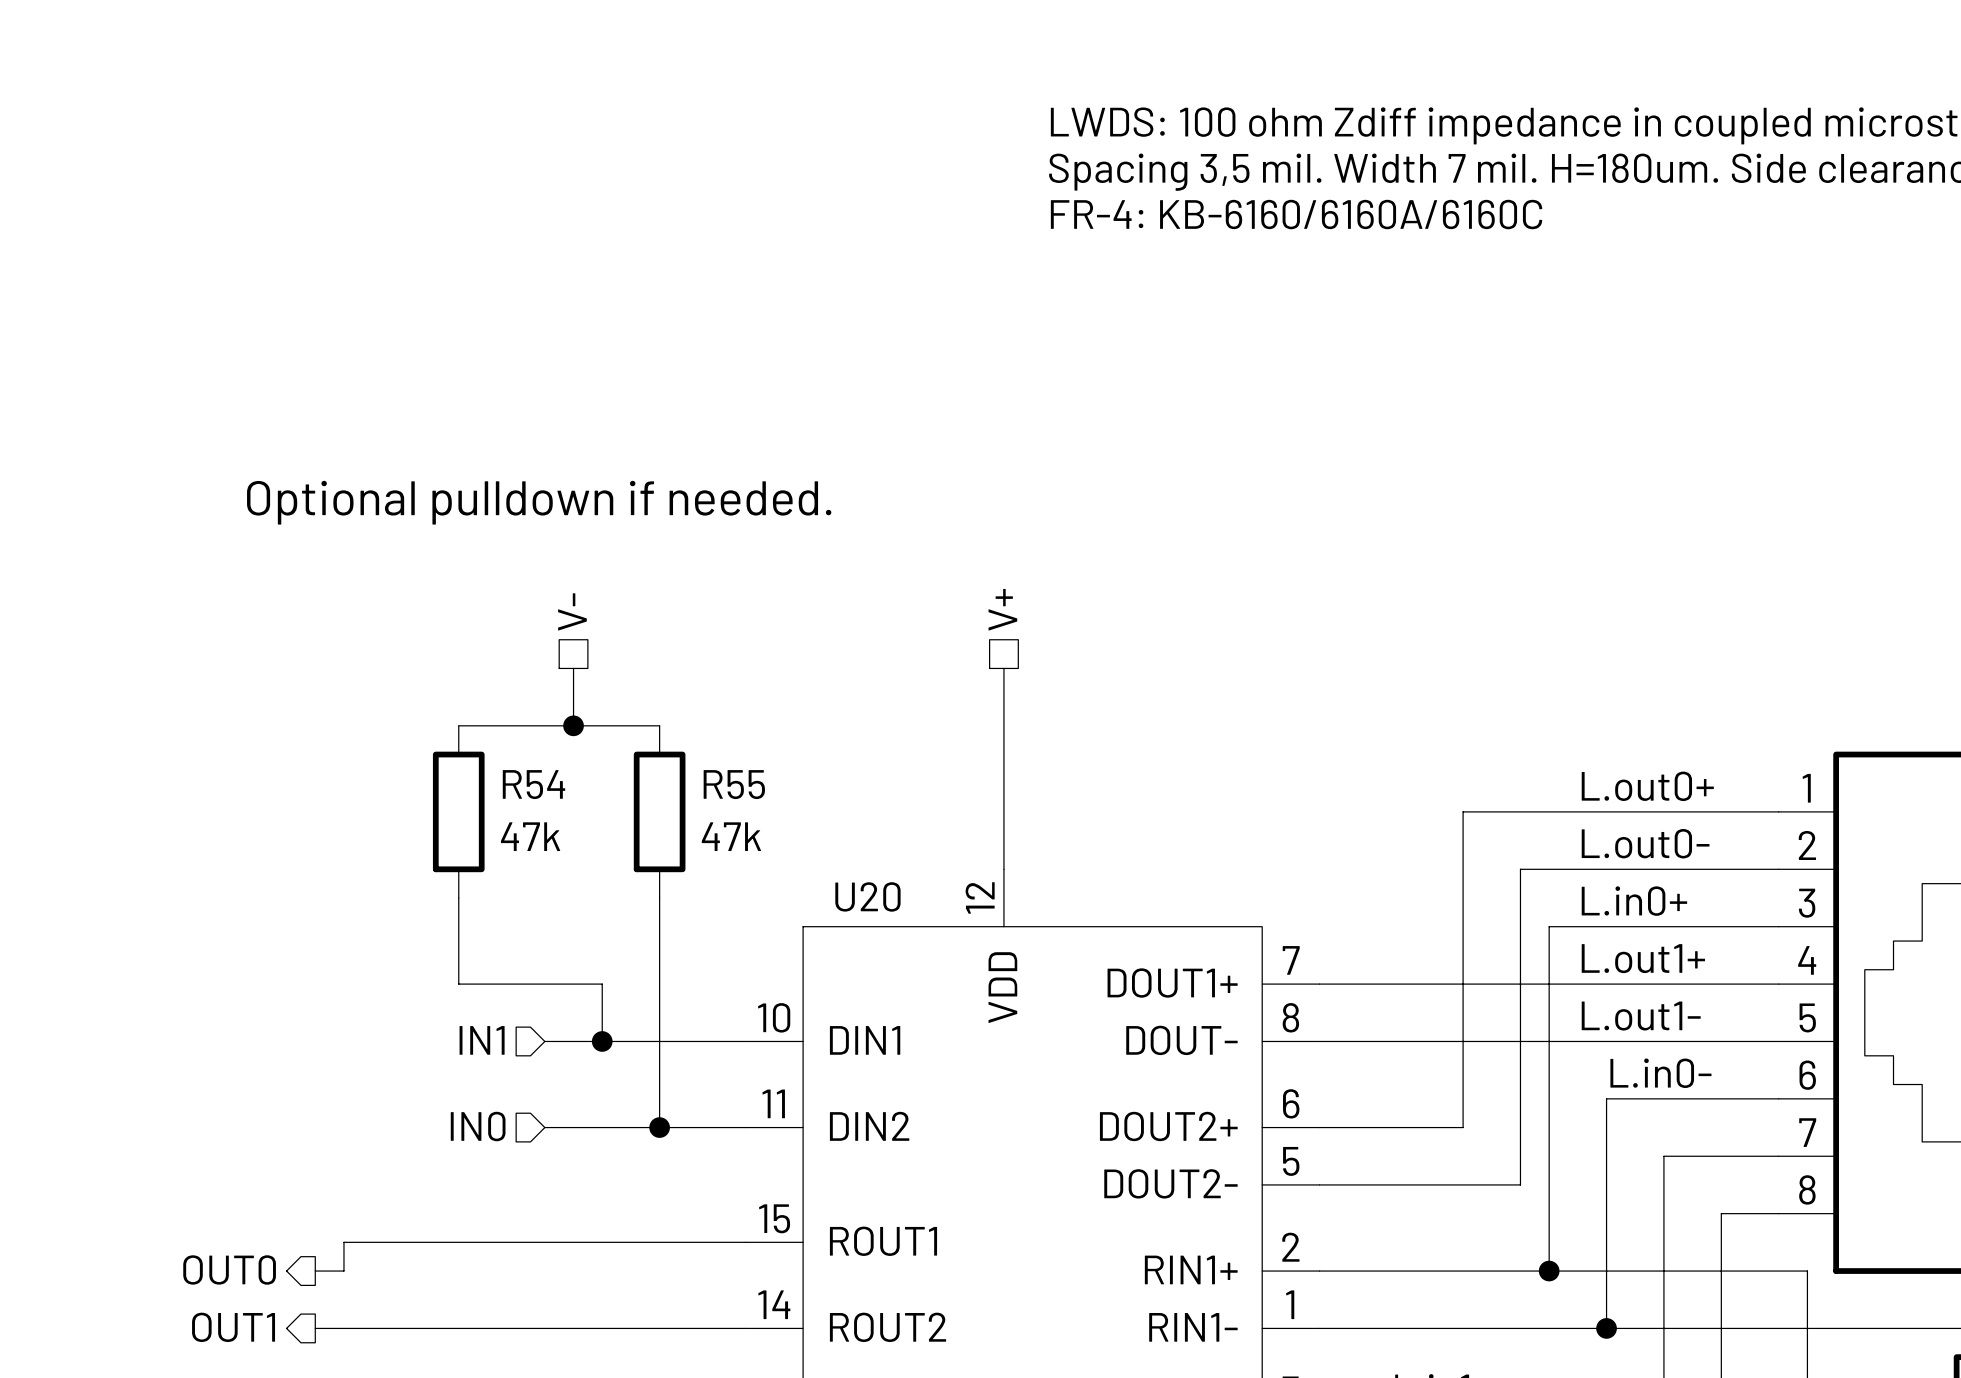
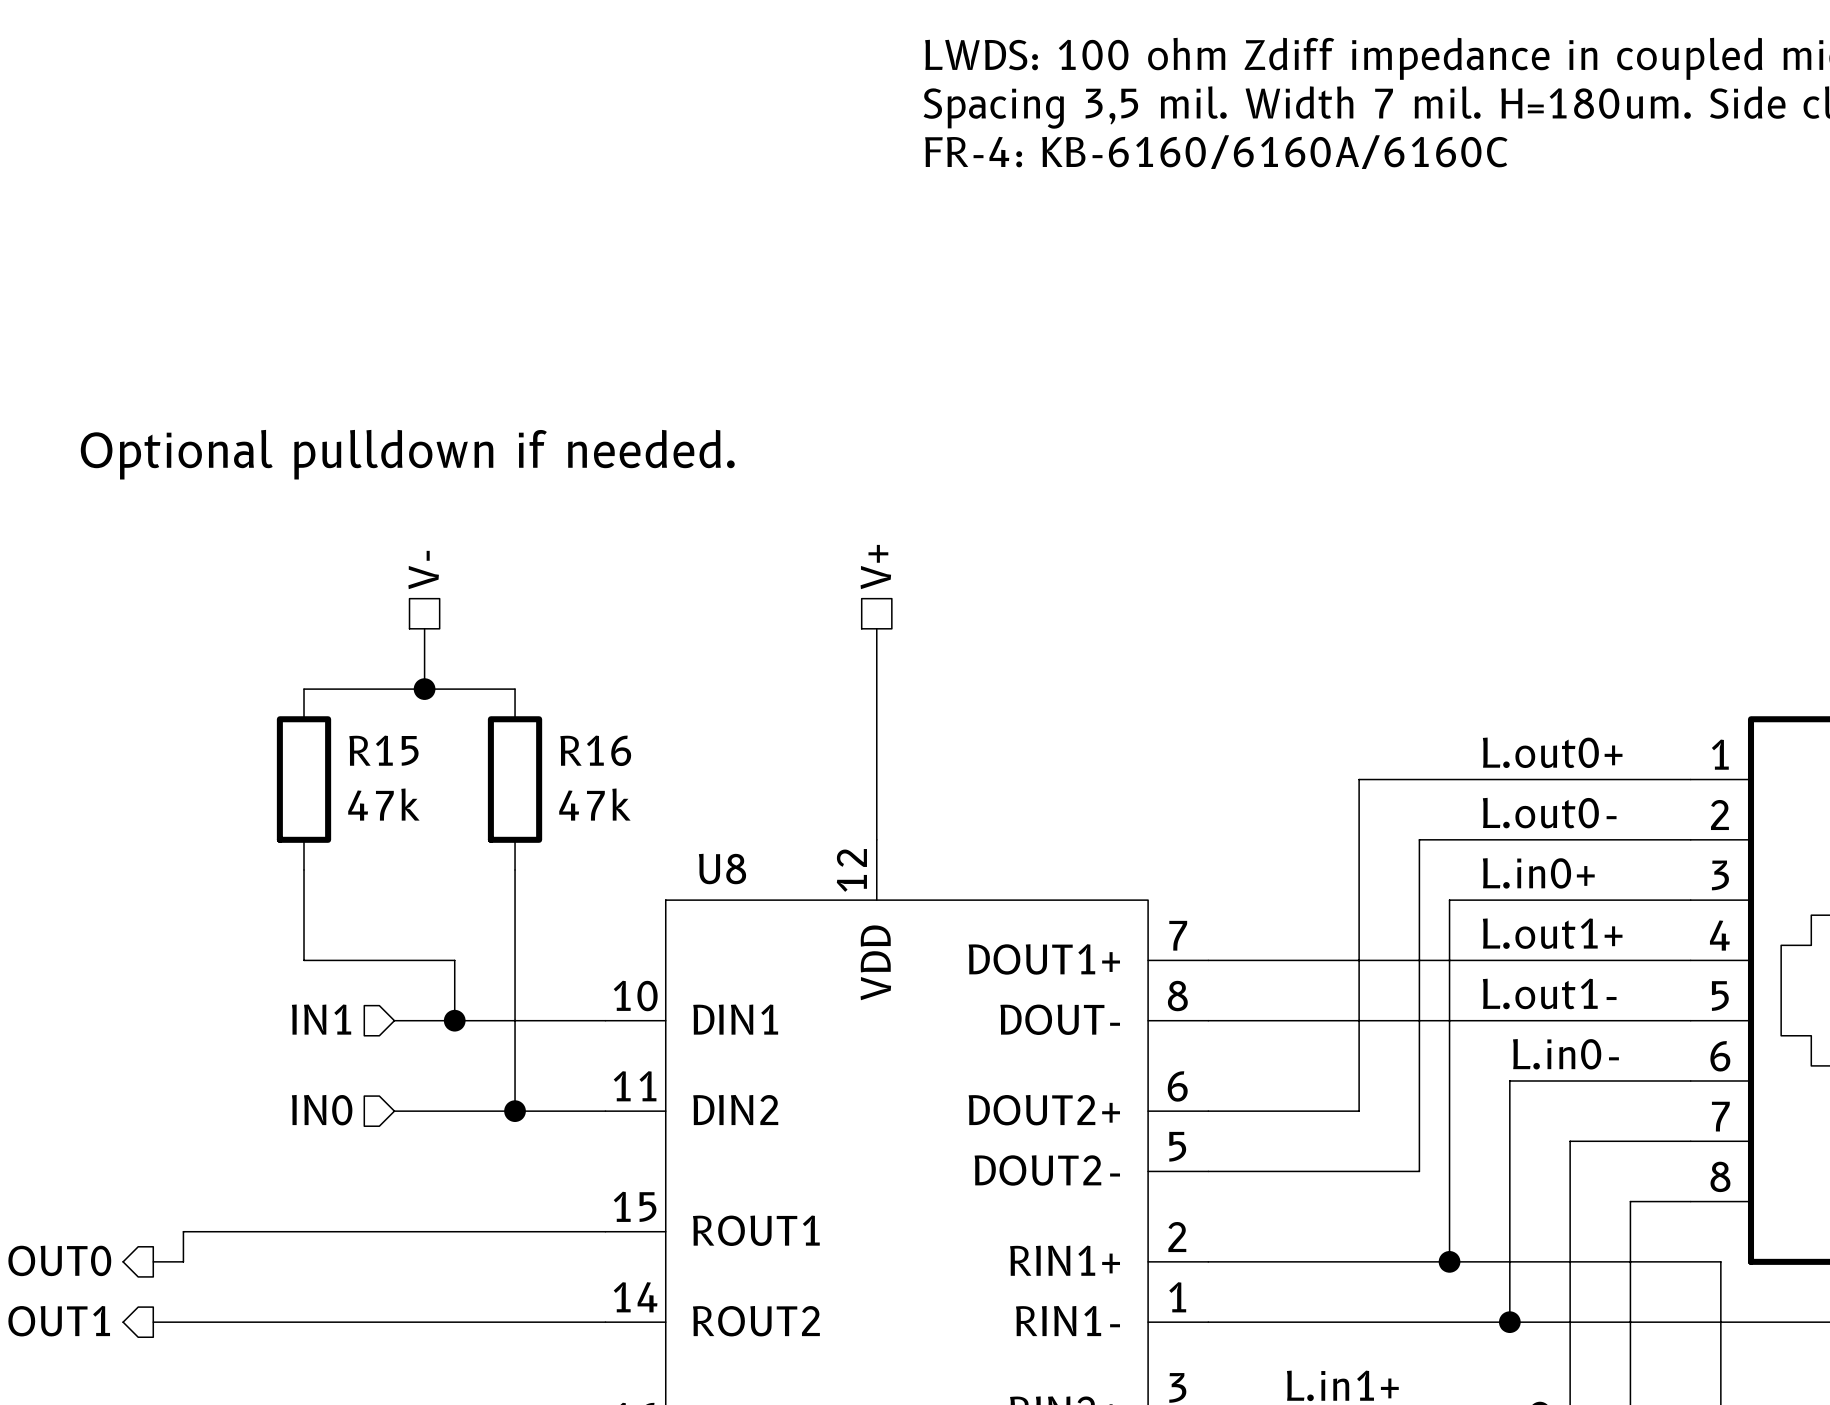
R54 name: R54 (533, 784) -> R15 (383, 750)
R55 name: R55 (734, 784) -> R16 (595, 750)
U20 name: U20 (867, 896) -> U8 (722, 869)

